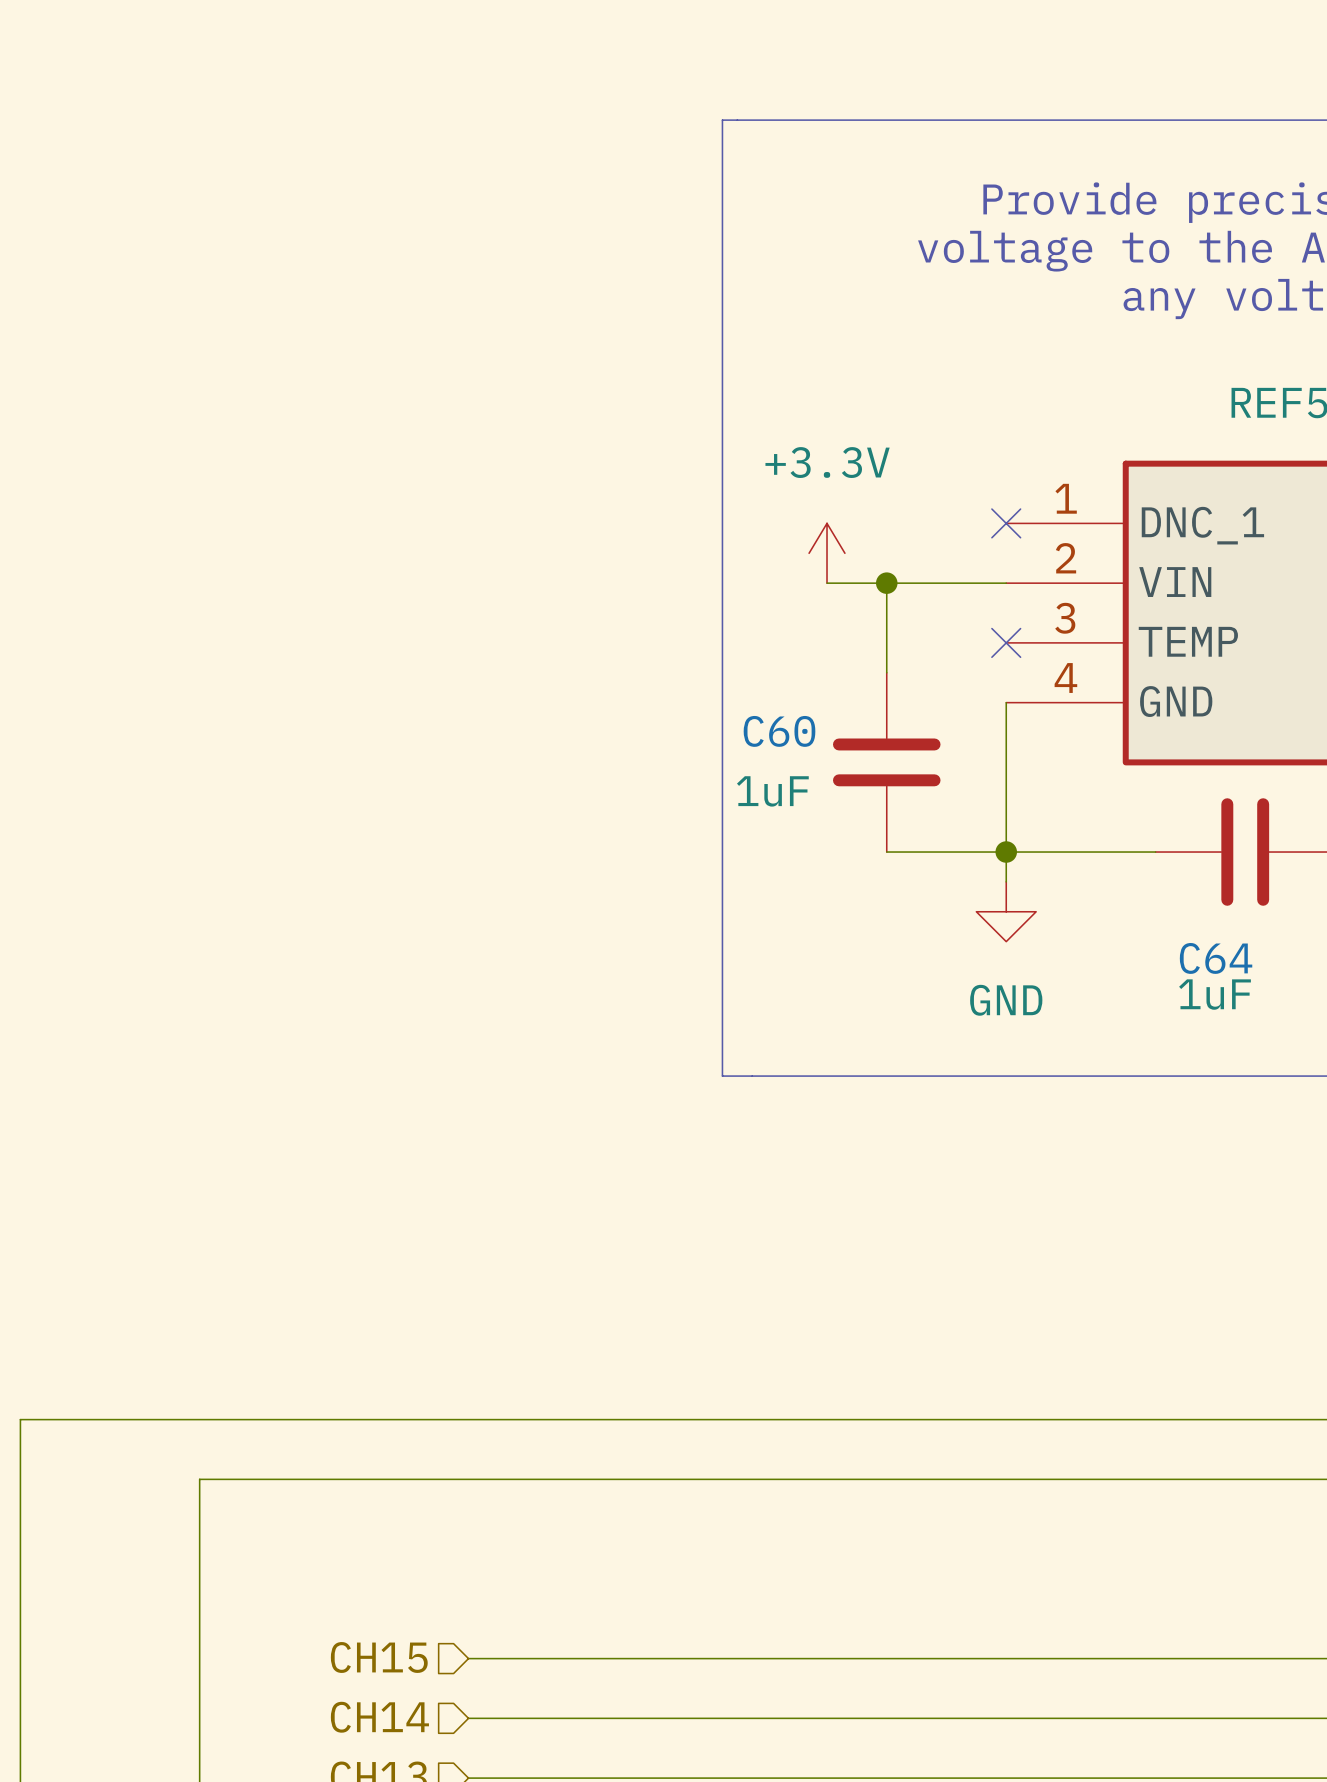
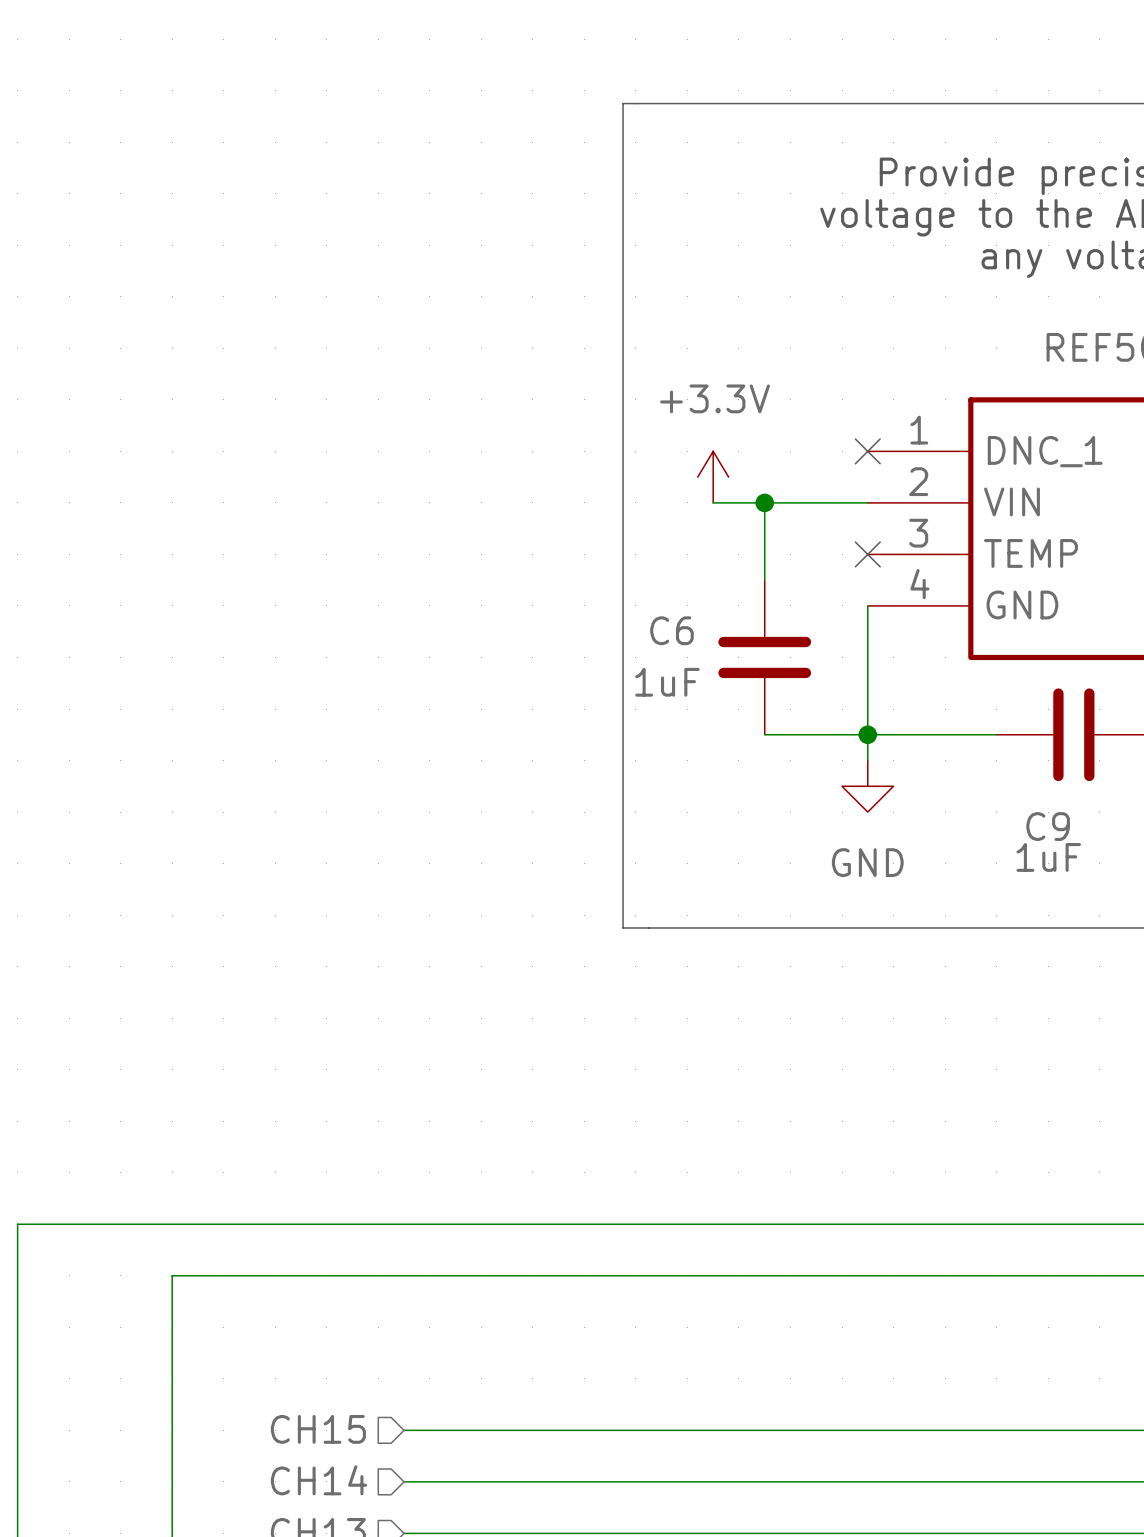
C60 name: C60 (779, 731) -> C6 (671, 630)
C64 name: C64 (1216, 958) -> C9 (1048, 826)

